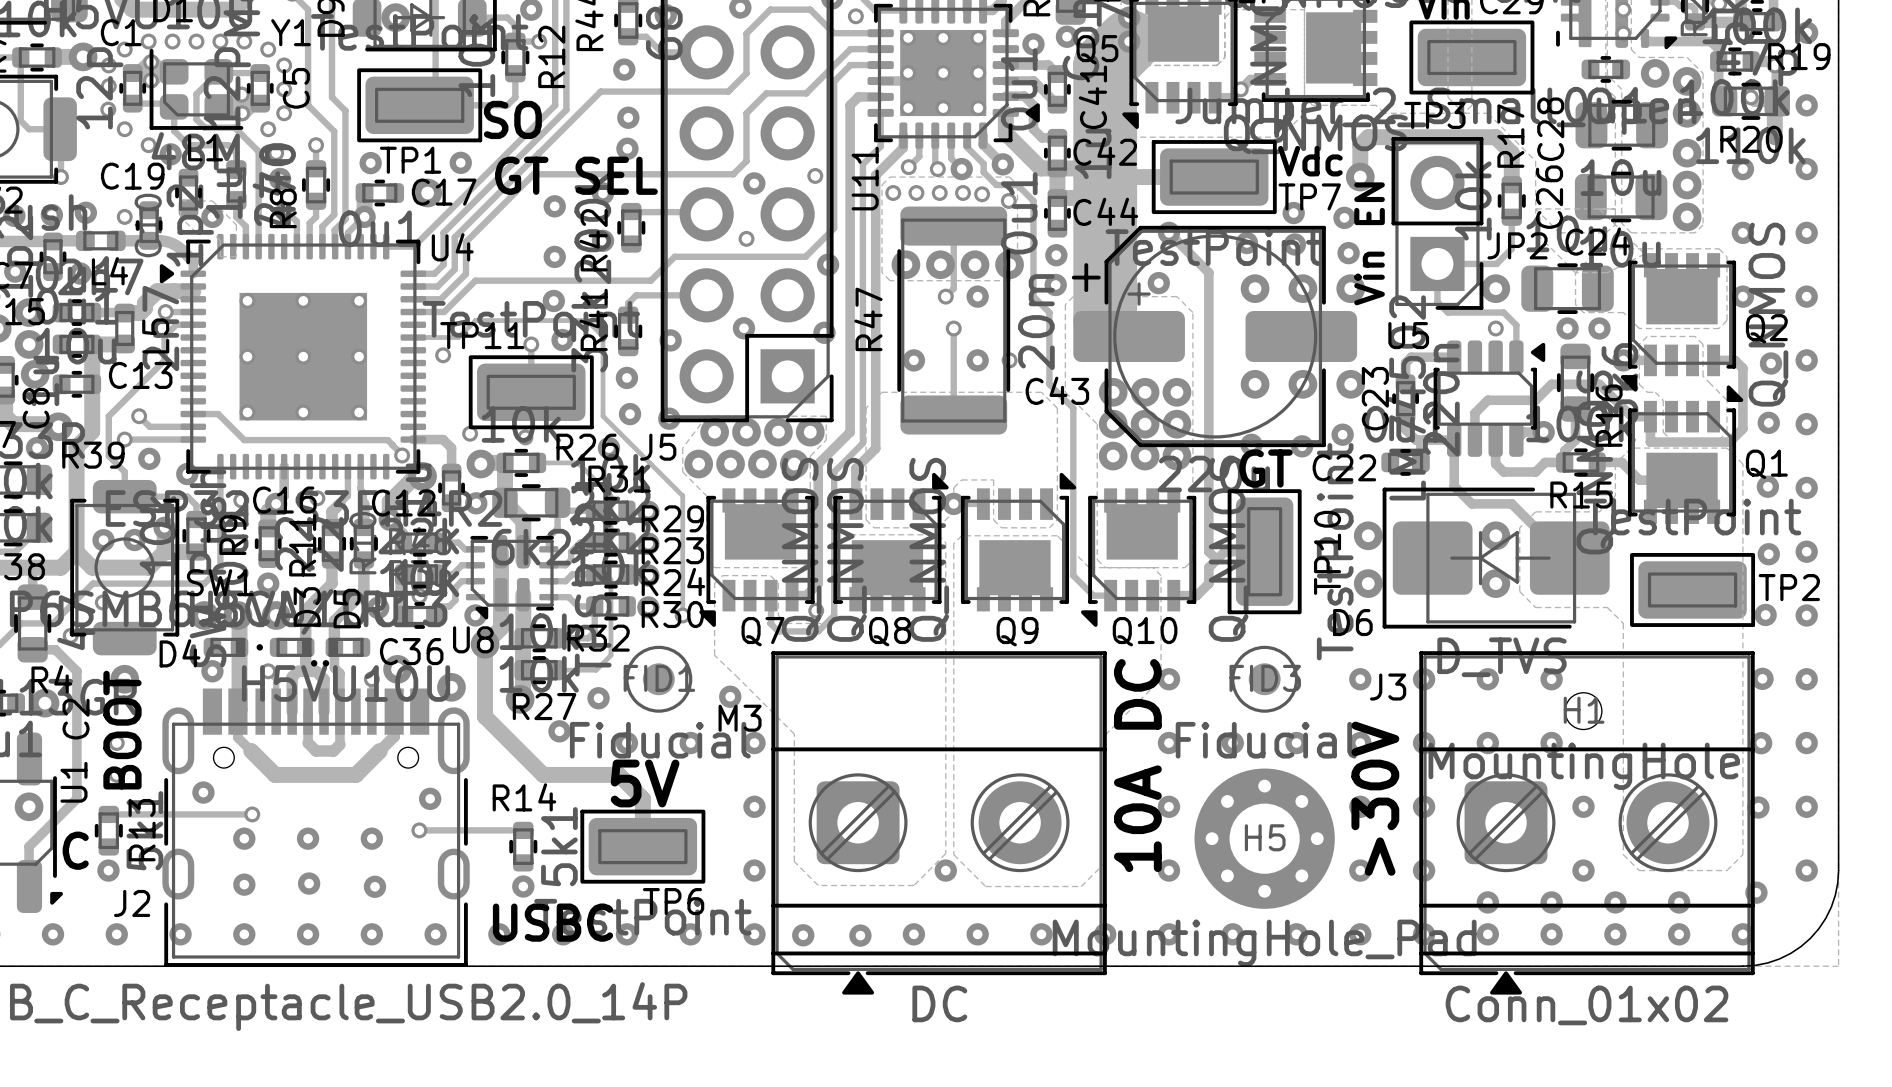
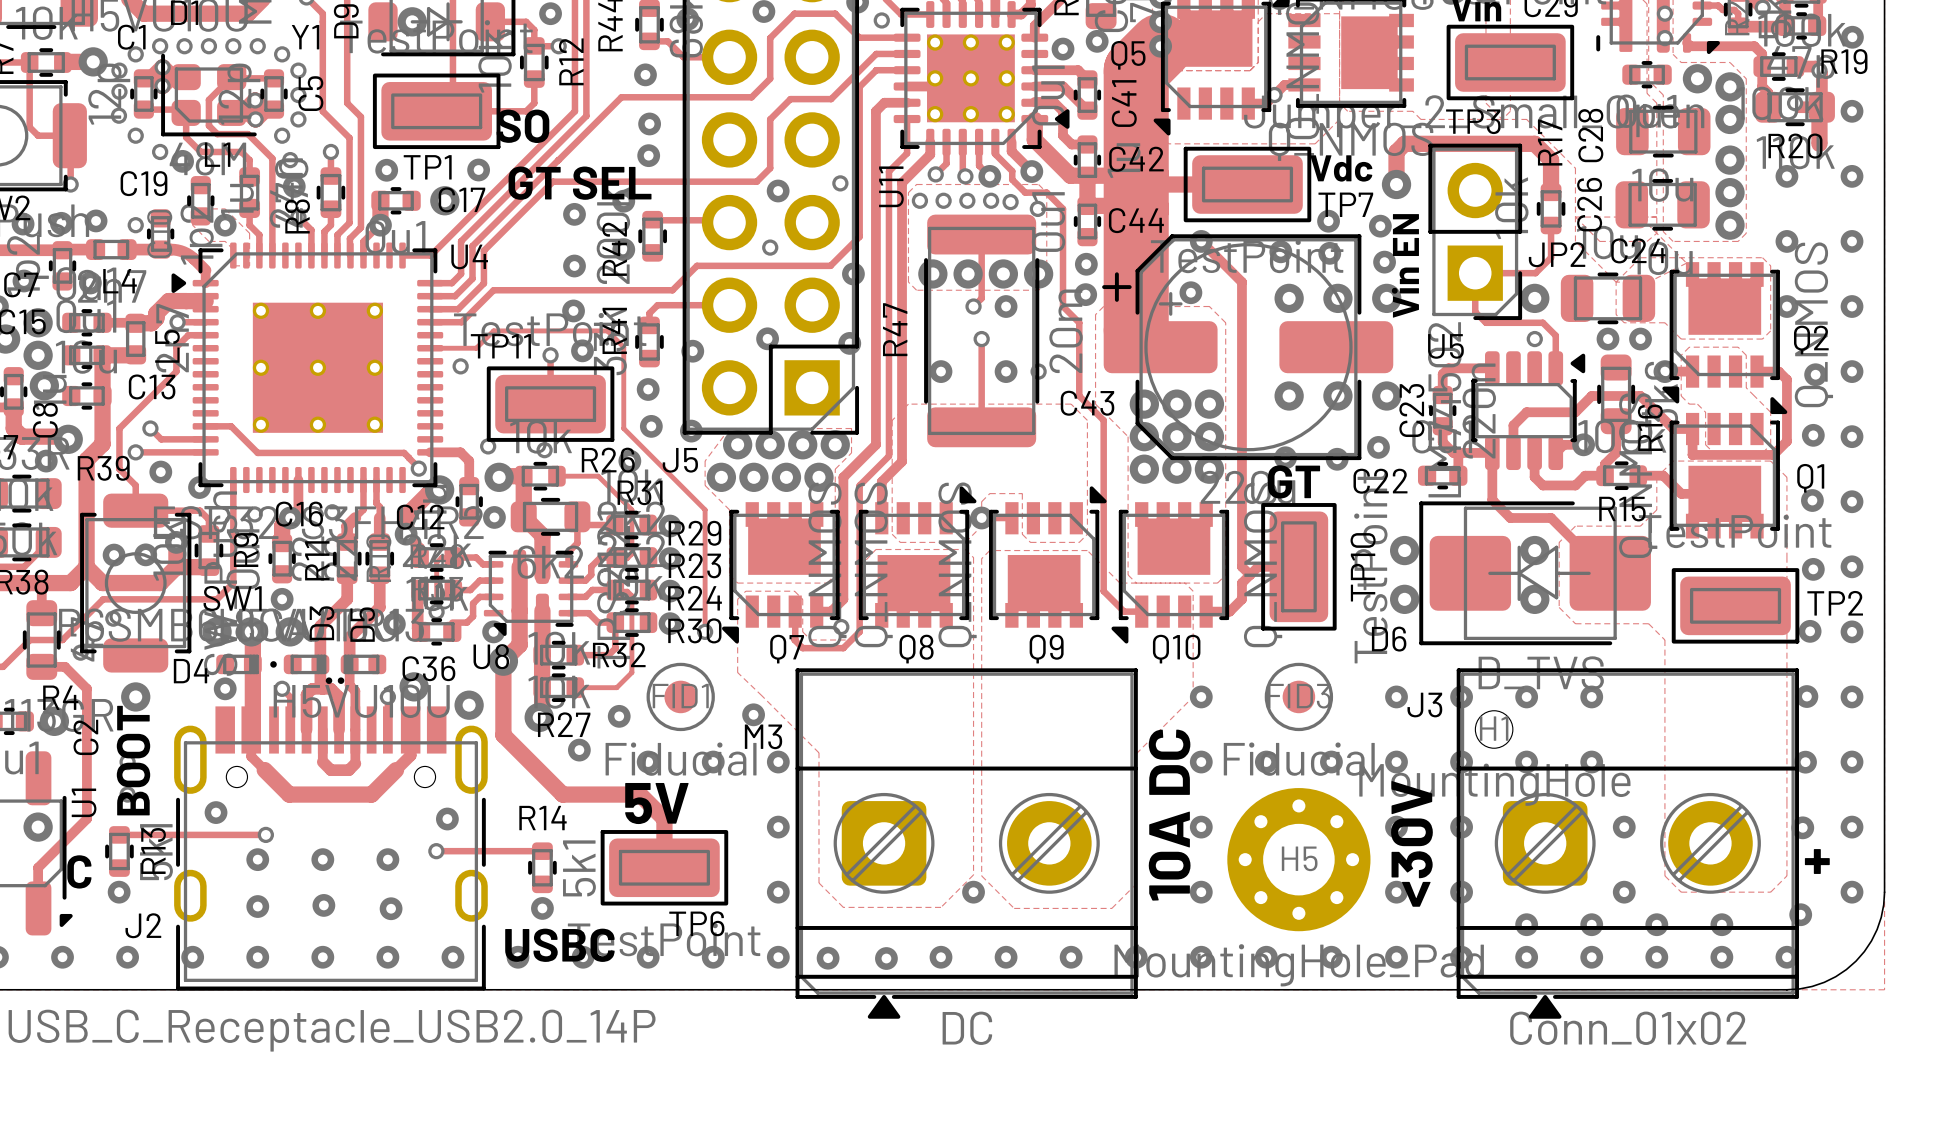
H1 position: (1583, 711) -> (1494, 729)
text: >30V (1375, 798) -> <30V (1411, 843)
text: none -> + (1817, 861)

